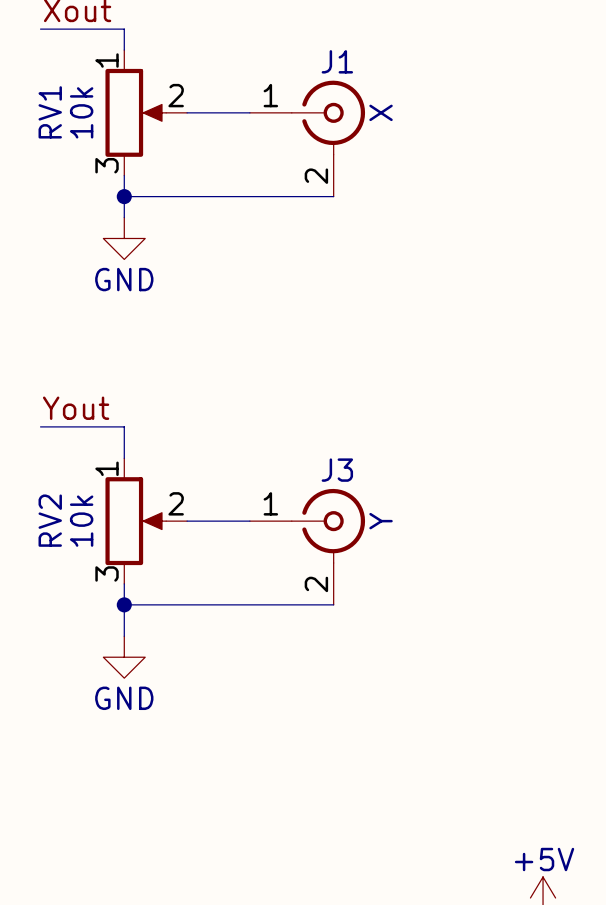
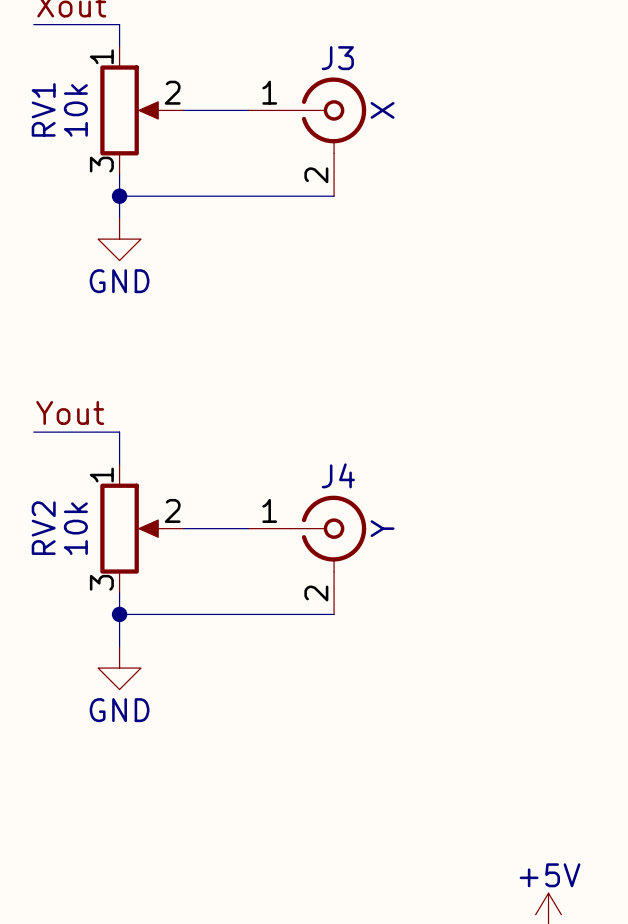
J1 name: J1 (337, 61) -> J3 (337, 58)
J3 name: J3 (337, 470) -> J4 (338, 475)

